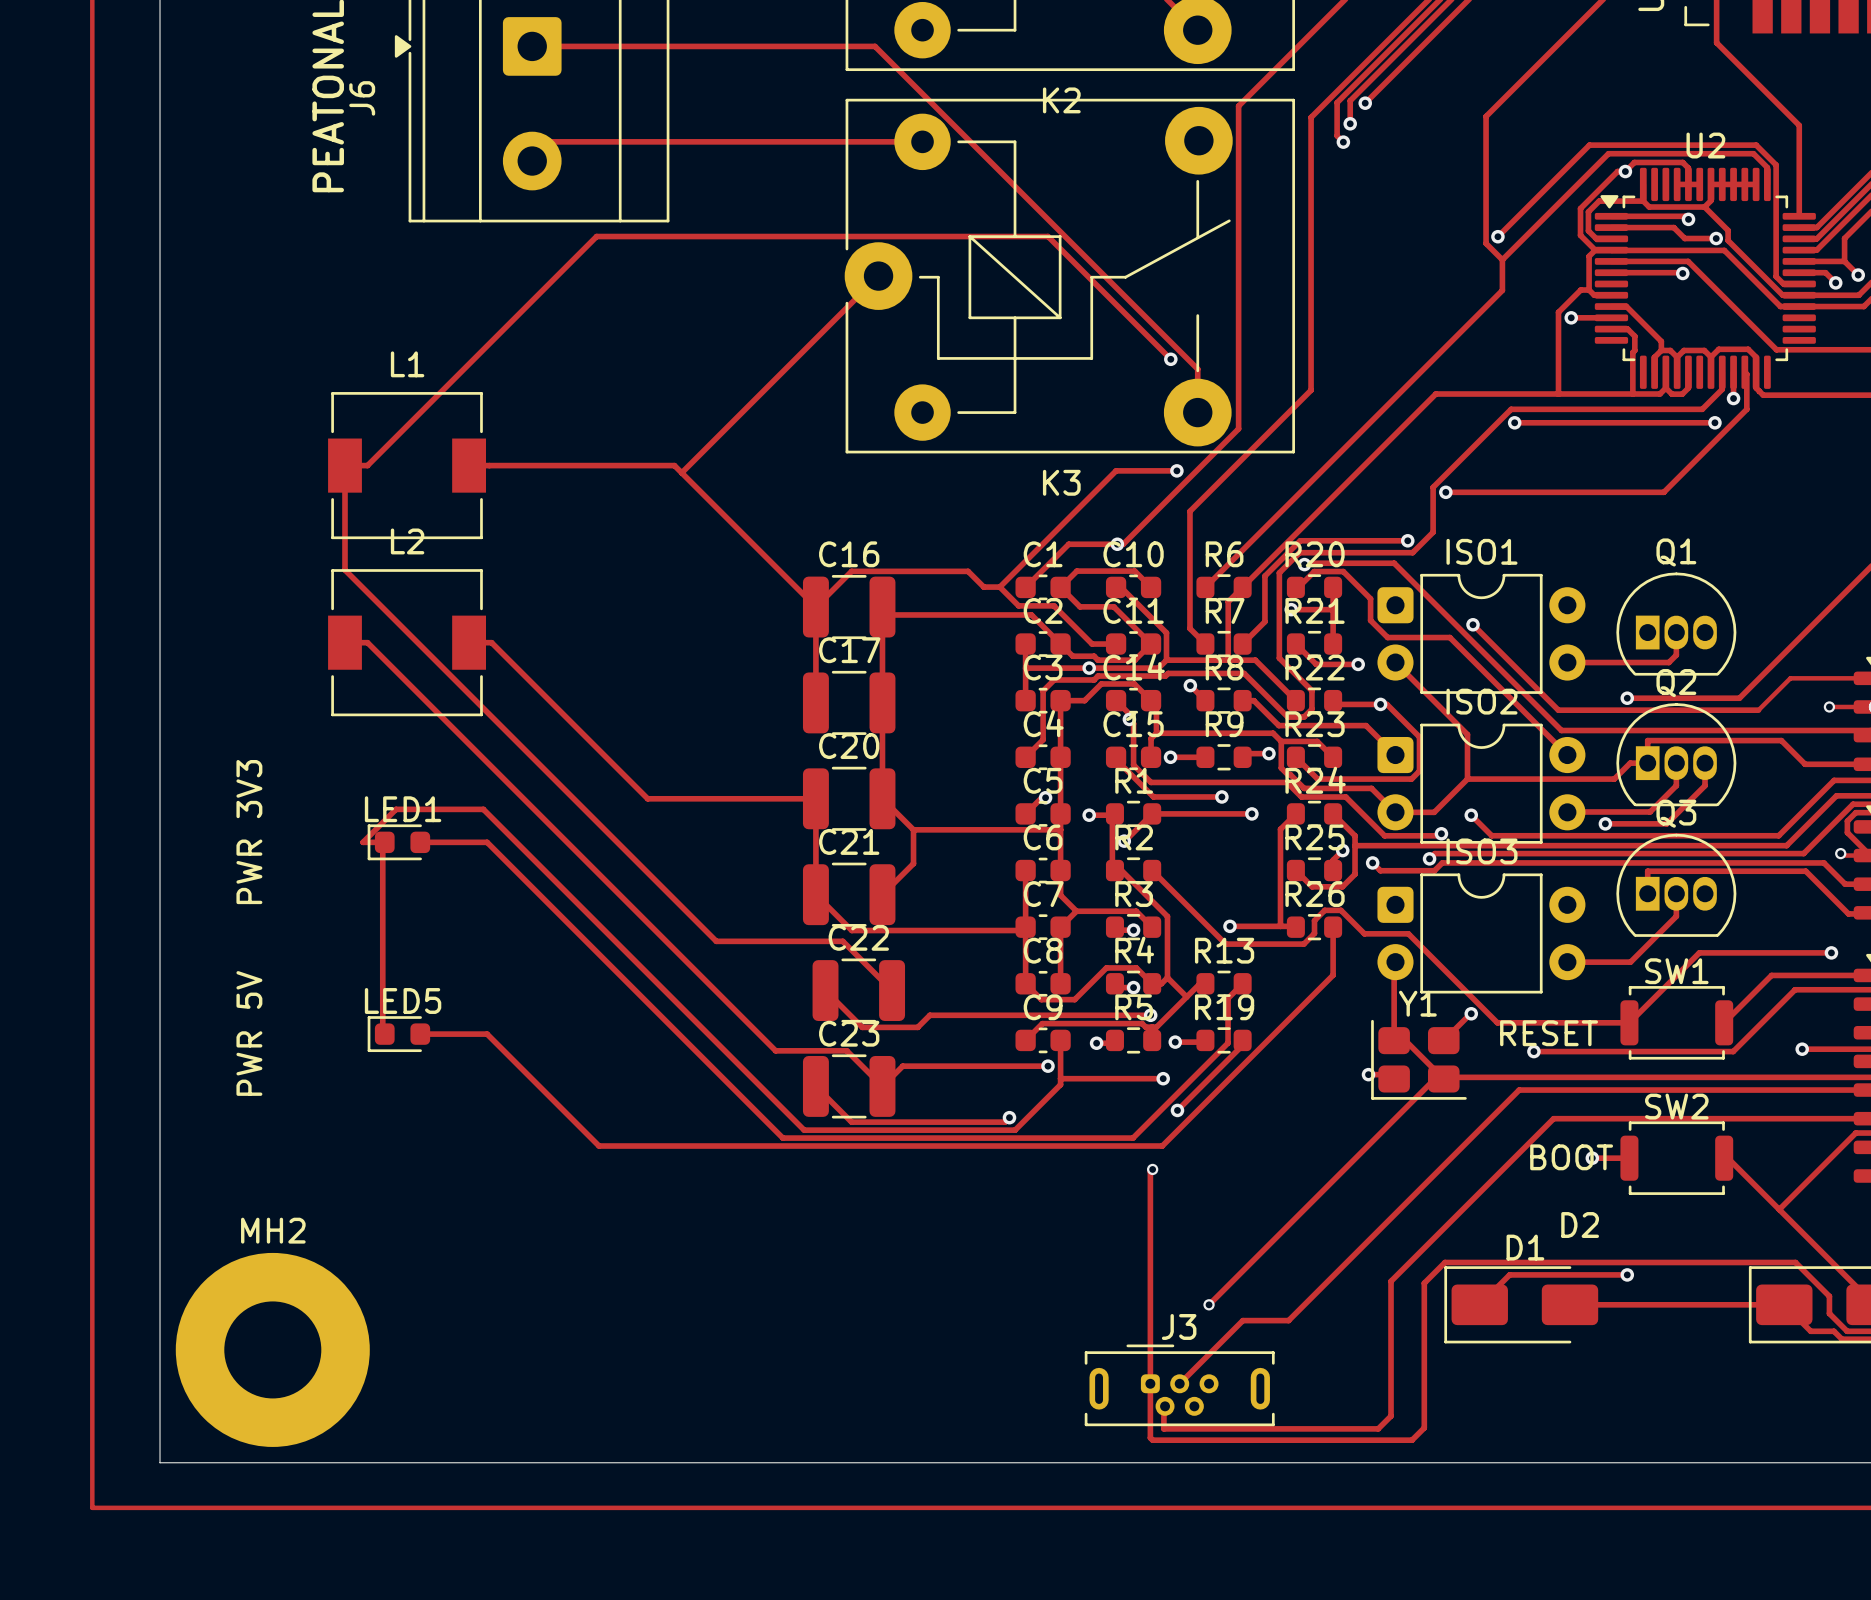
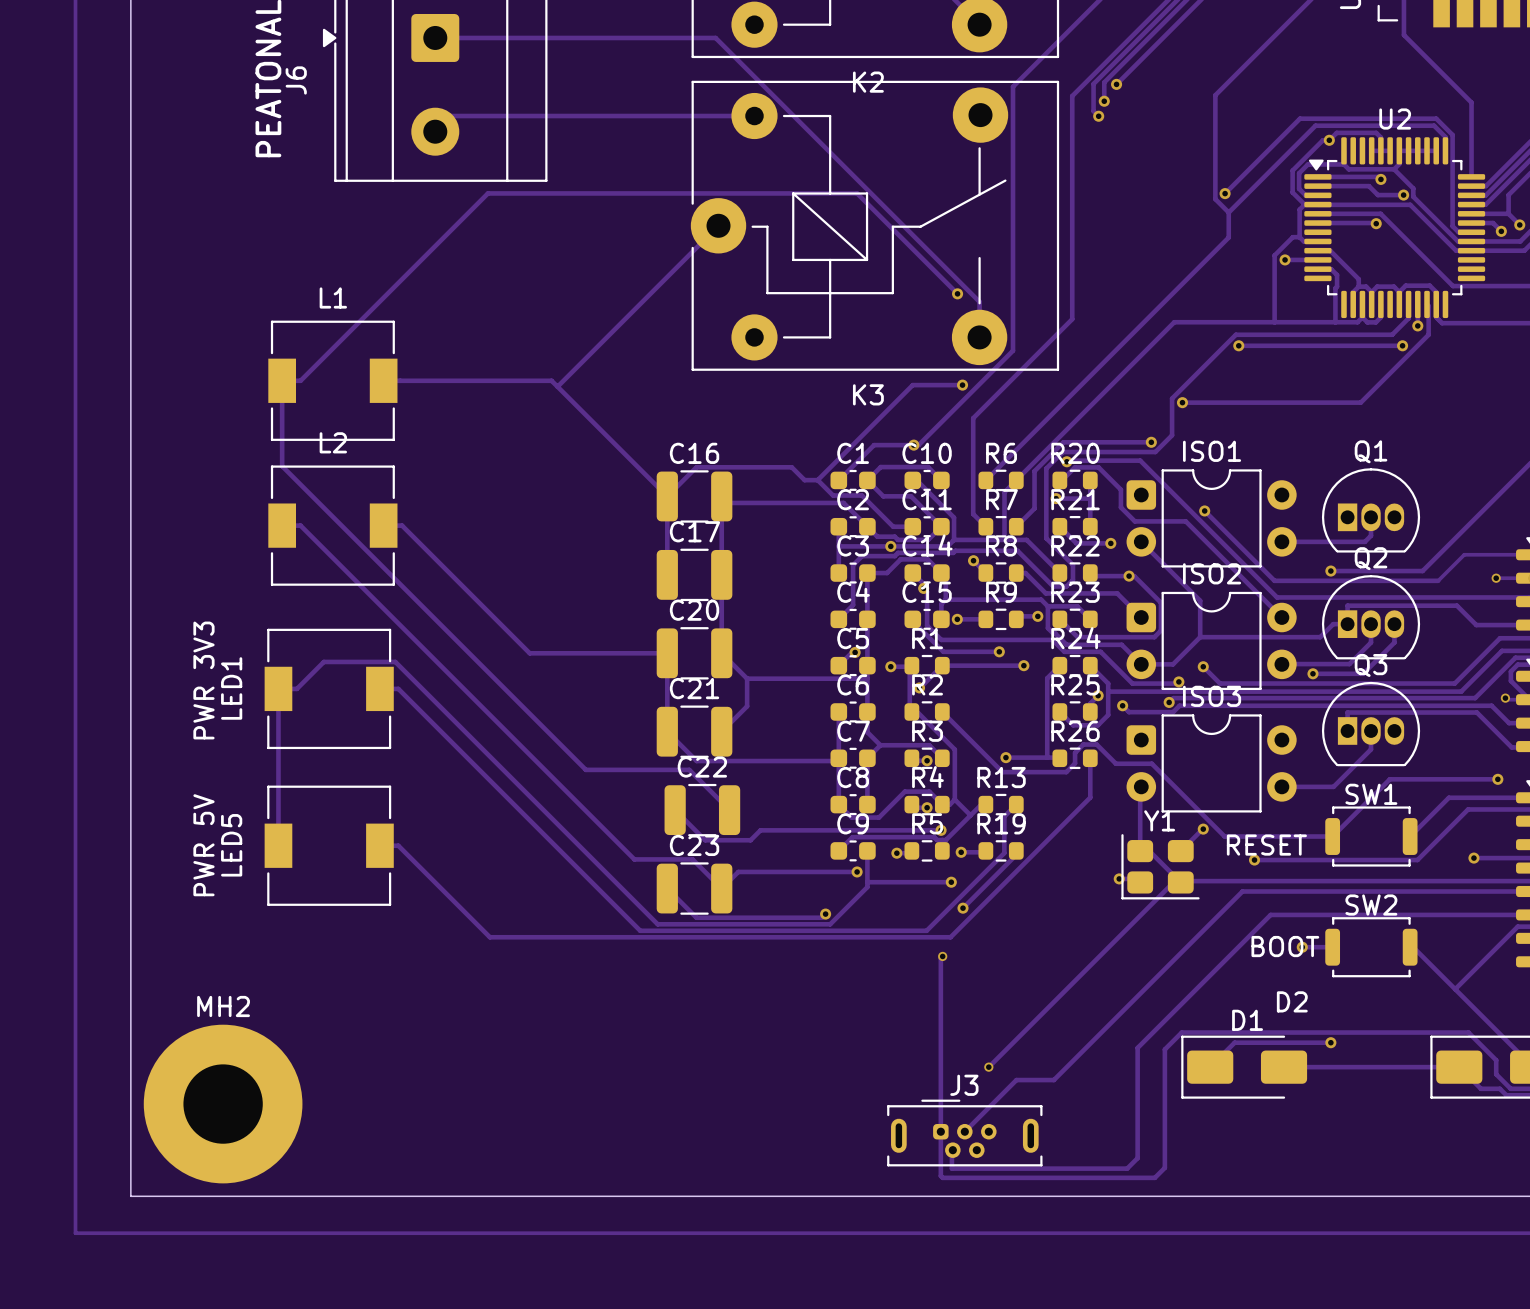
LED1 name position: LED1 (403, 809) -> LED1 (231, 688)
LED1 footprint: [367, 824, 431, 861] -> [264, 628, 394, 750]
track: (363, 842) (382, 842) (382, 1034) -> (296, 688) (278, 688) (278, 845)
track: (422, 842) (464, 842) -> none
LED5 name position: LED5 (403, 1000) -> LED5 (231, 845)
LED5 footprint: [367, 1016, 431, 1053] -> [264, 785, 394, 906]
track: (422, 1034) (464, 1034) -> none

